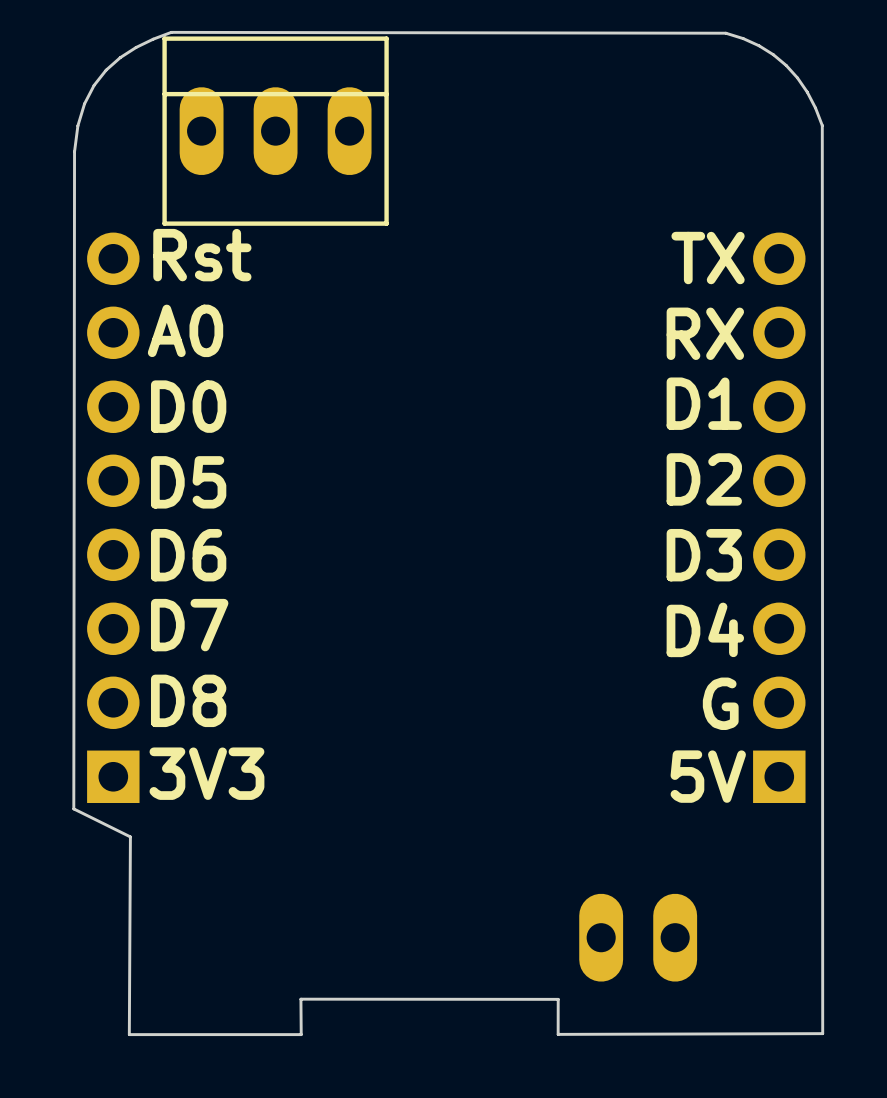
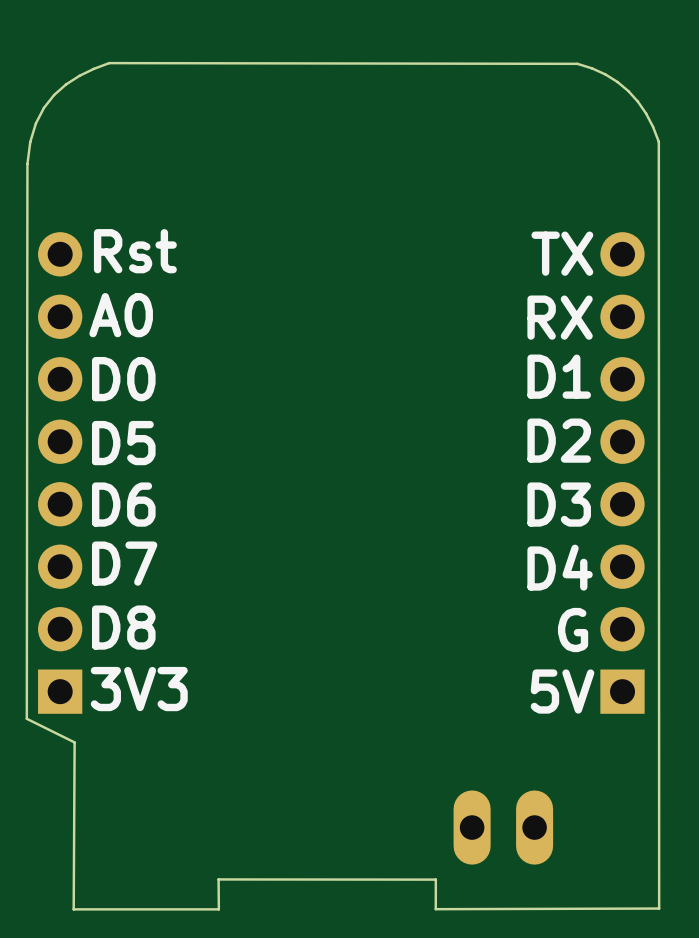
part: (275, 131) -> none

